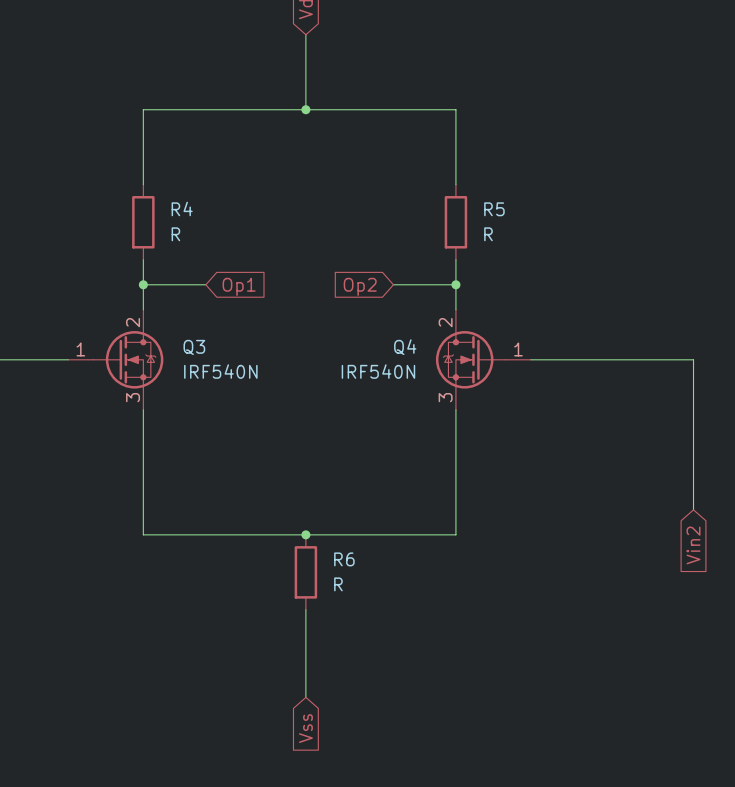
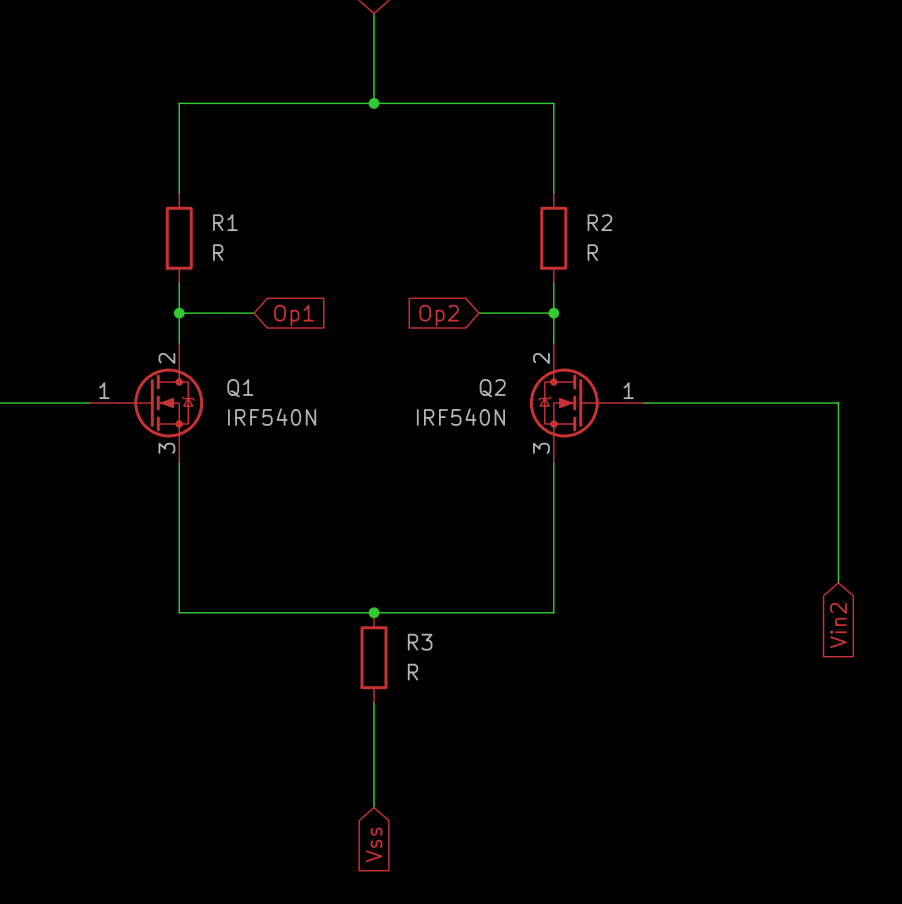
R4 name: R4 (182, 209) -> R1 (225, 222)
R5 name: R5 (494, 209) -> R2 (599, 222)
Q3 name: Q3 (194, 347) -> Q1 (240, 388)
Q4 name: Q4 (405, 347) -> Q2 (492, 388)
R6 name: R6 (344, 559) -> R3 (420, 642)

